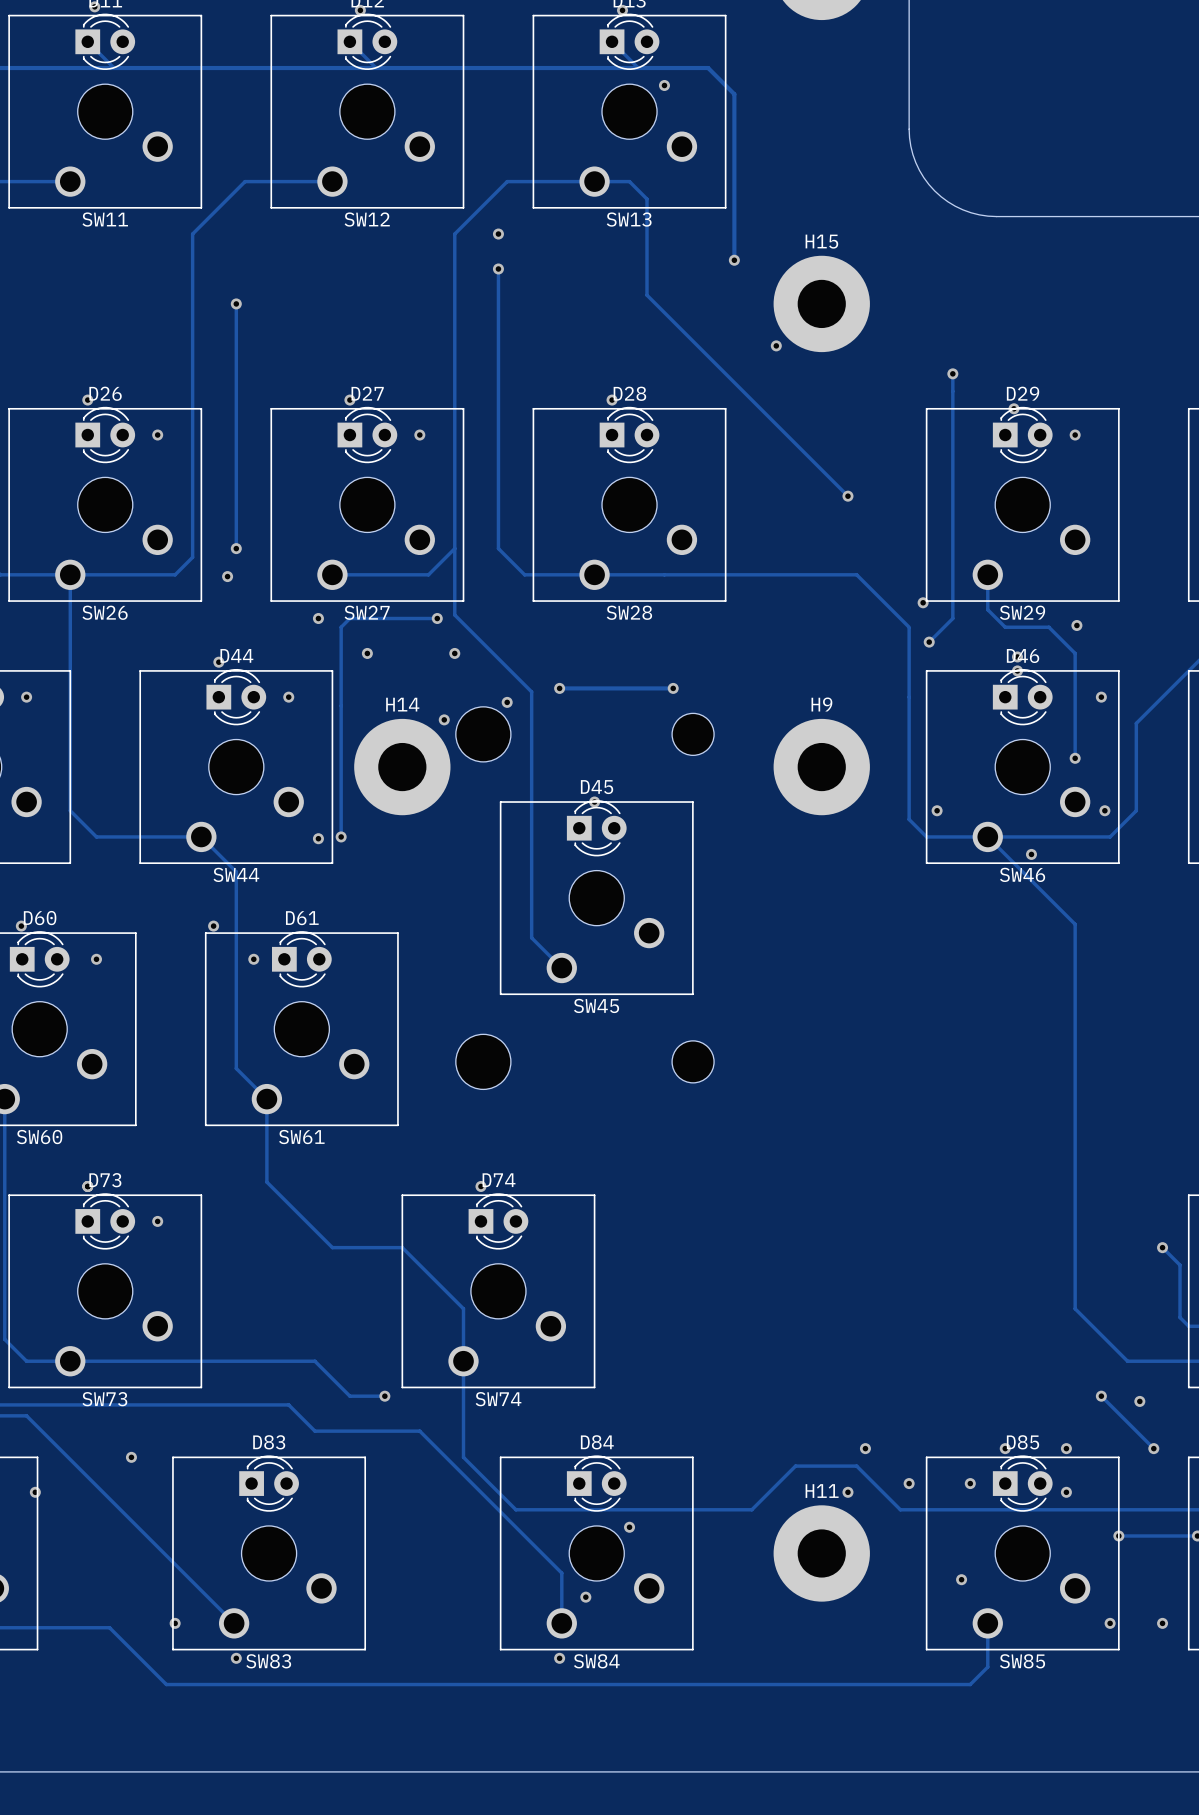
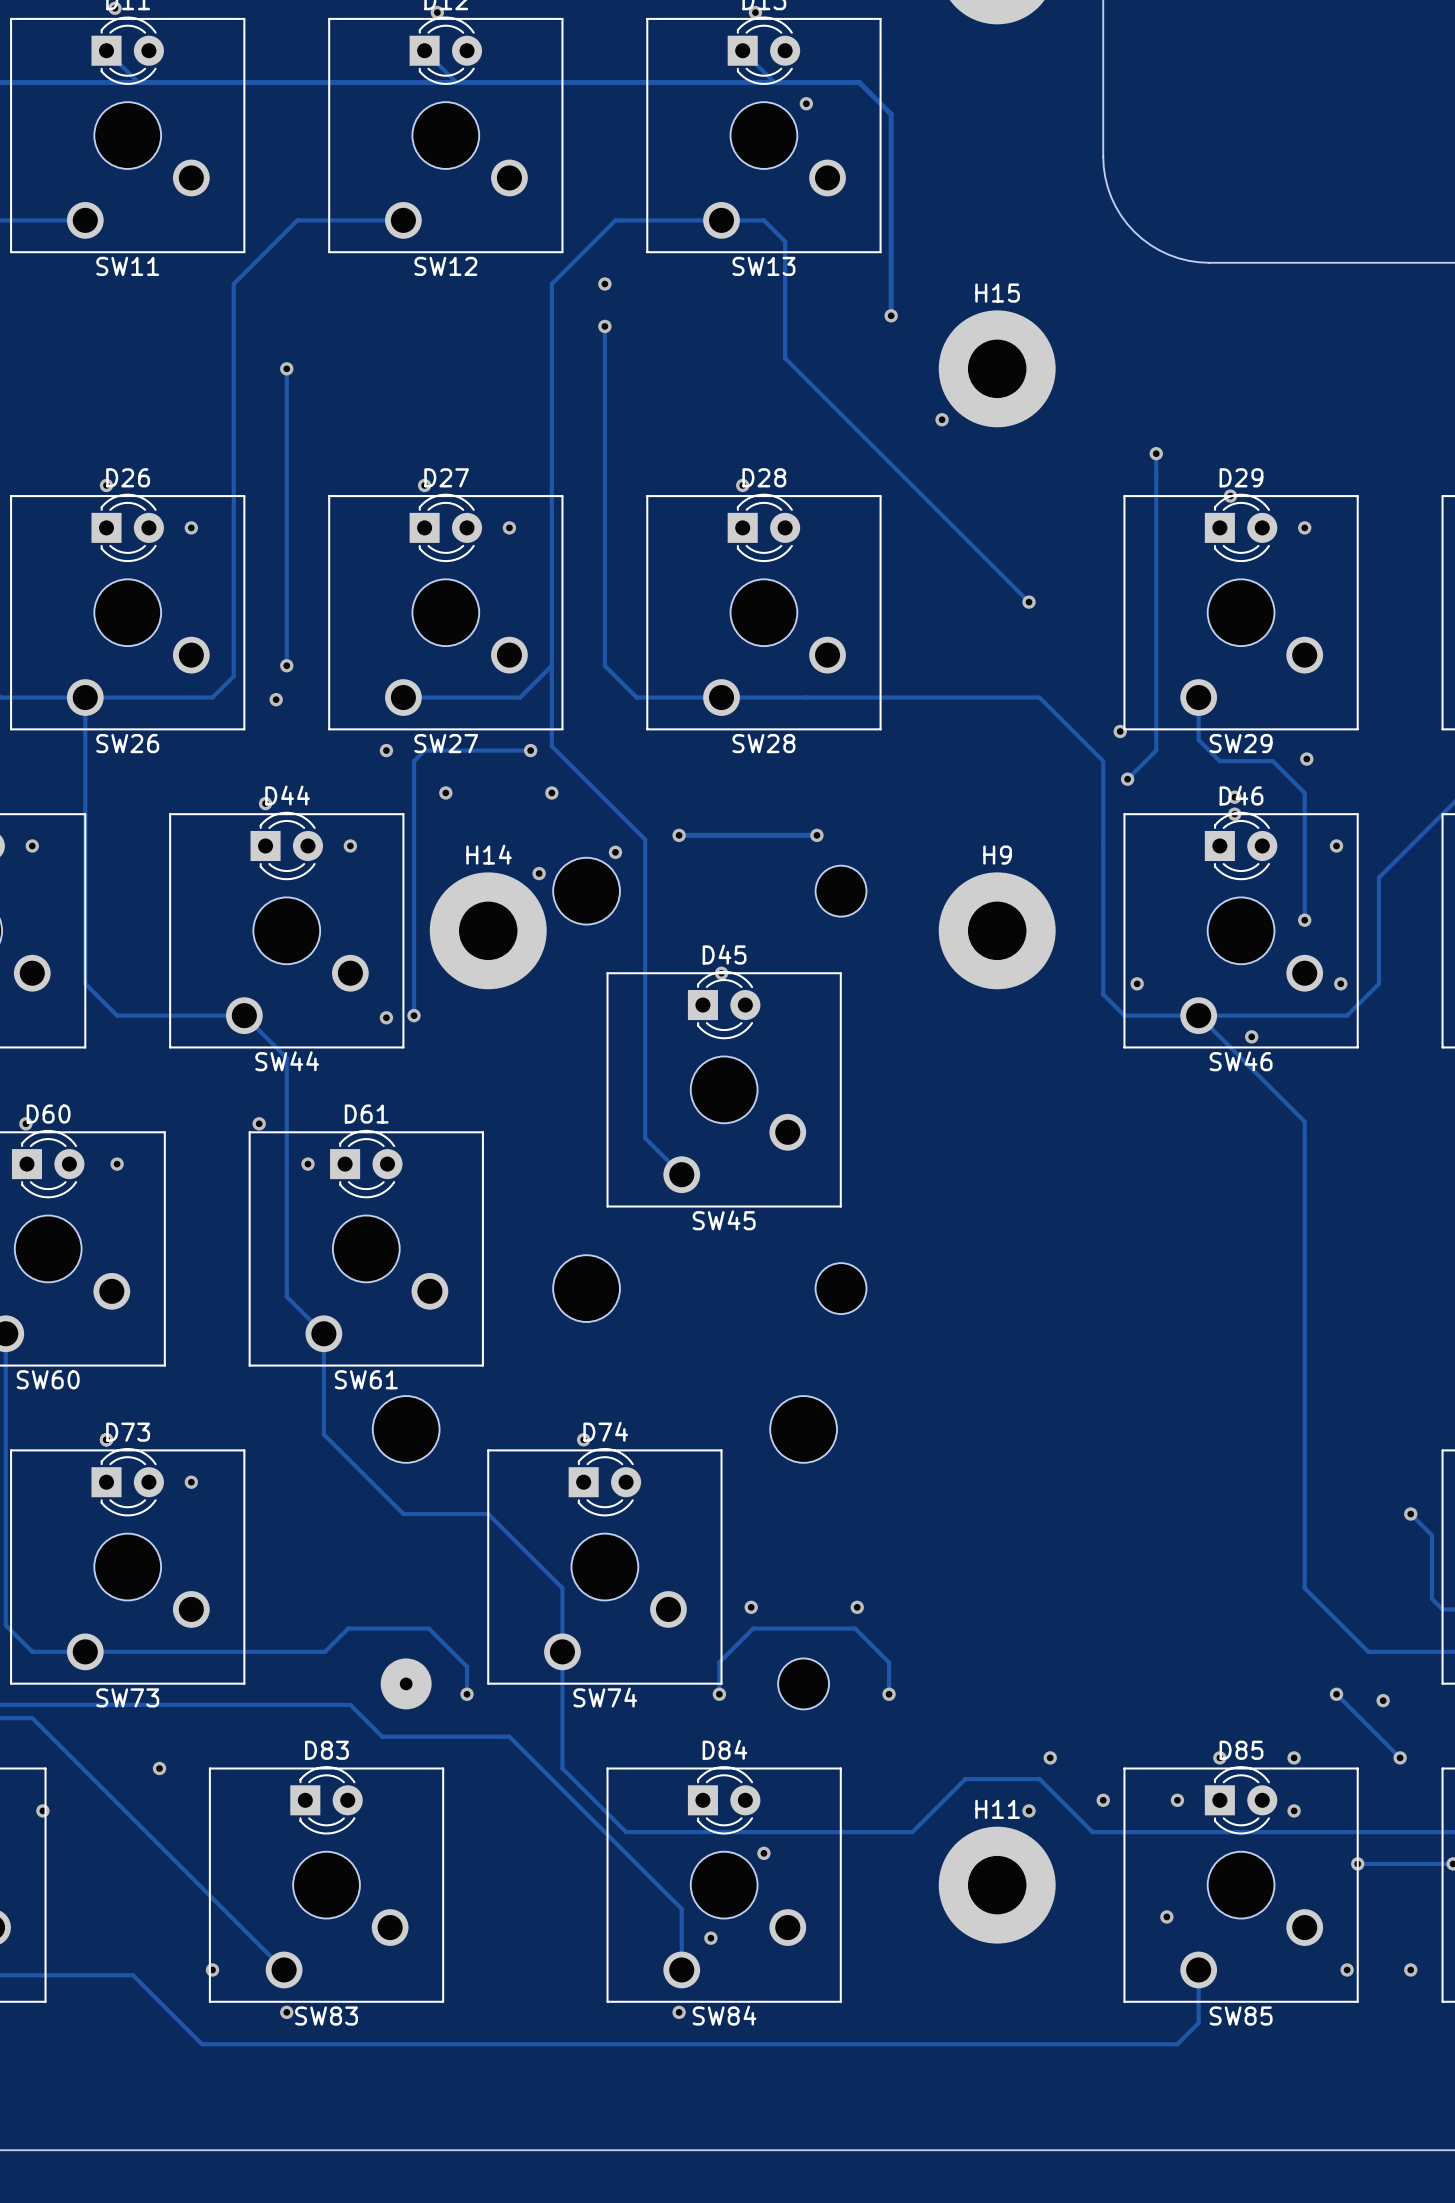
SW74 footprint: [401, 1194, 596, 1389] -> [372, 1396, 837, 1710]
via: none -> (751, 1607)
via: none -> (857, 1607)
track: (267, 1361) (314, 1361) (349, 1396) (384, 1396) -> (324, 1651) (348, 1628) (428, 1628) (467, 1666) (467, 1694)
track: none -> (719, 1694) (719, 1662) (753, 1628) (855, 1628) (889, 1662) (889, 1694)
via: none -> (719, 1694)
via: none -> (889, 1694)

